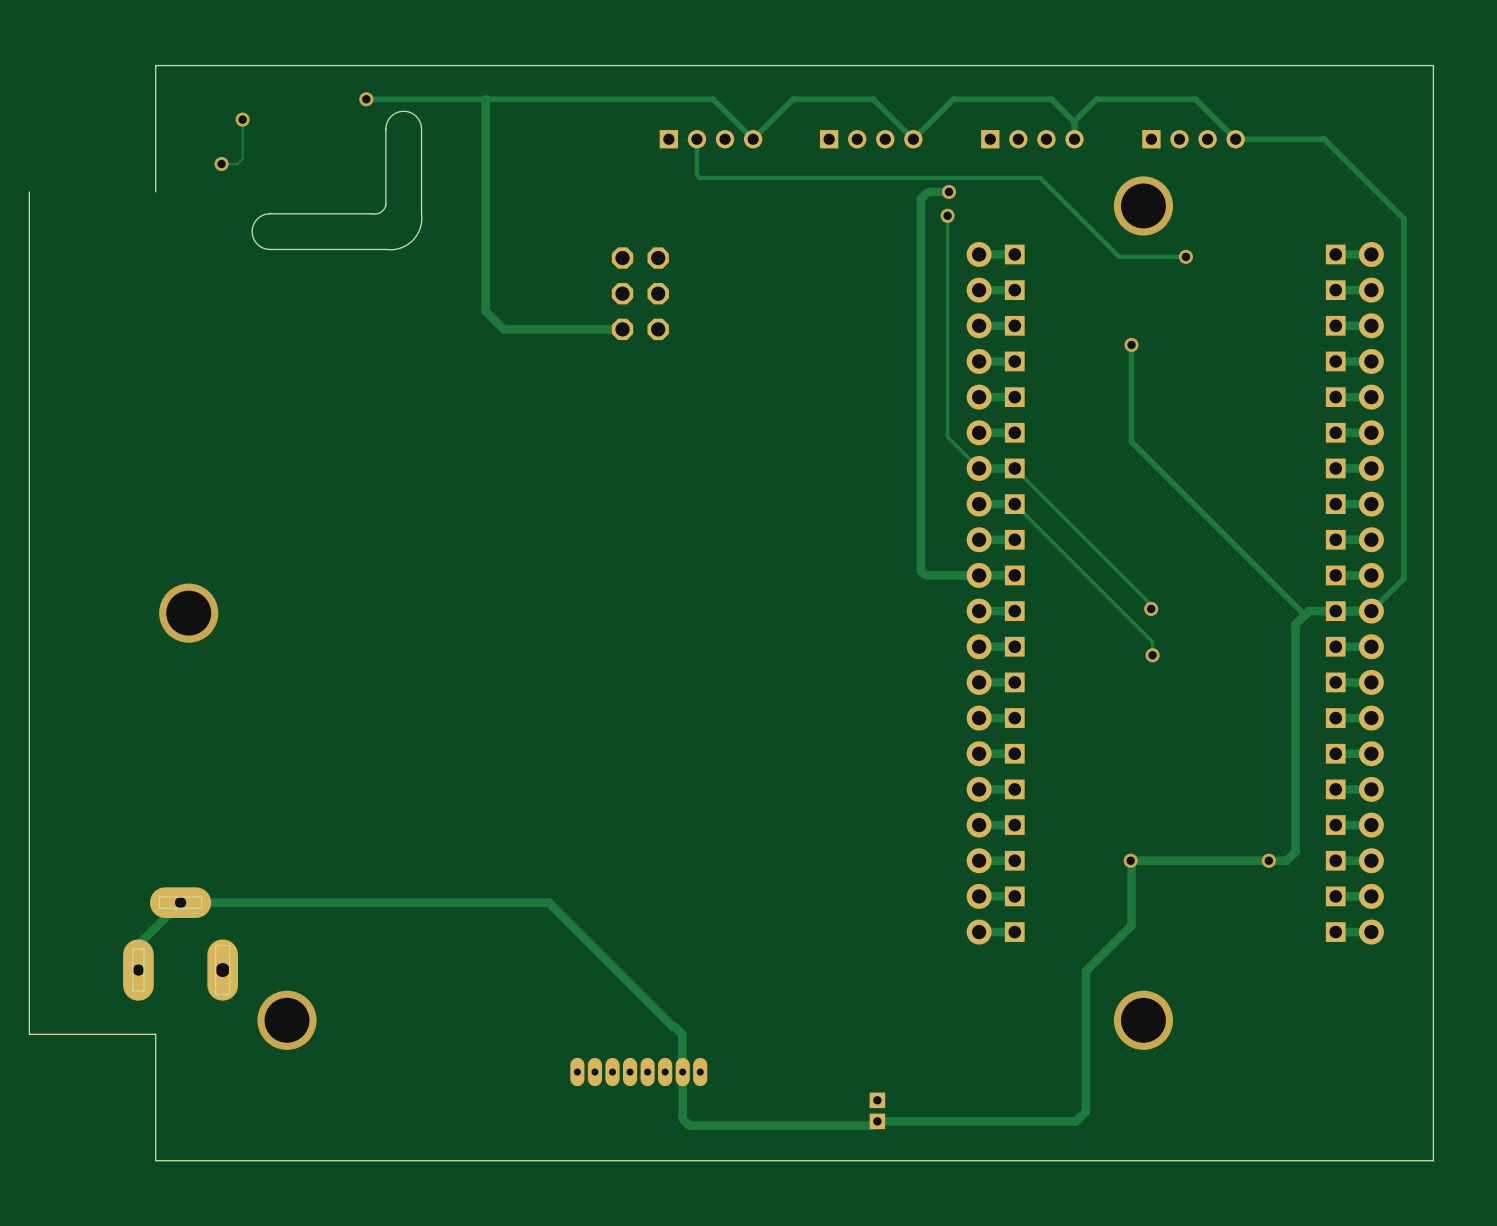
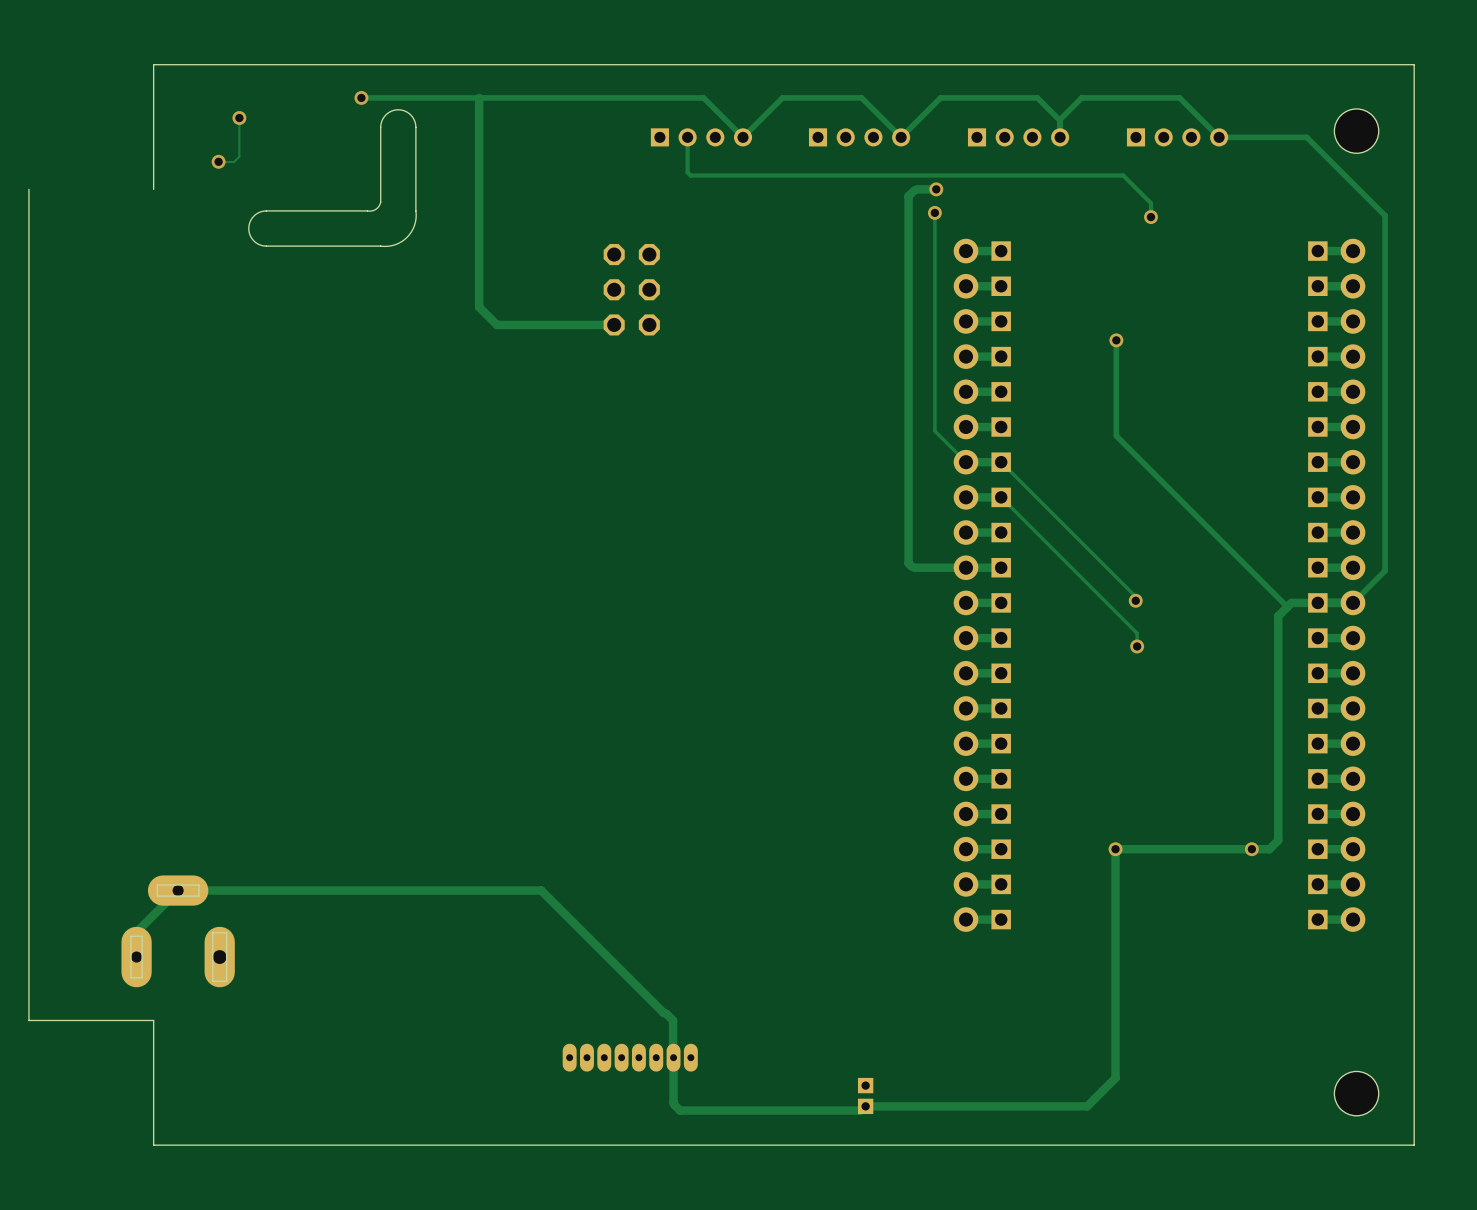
hole: none -> (1356, 131)
track: (1040, 177) (1119, 256) (1185, 256) -> (1026, 175) (1123, 175) (1150, 203) (1150, 217)
via: (1143, 205) -> none
via position: (1185, 256) -> (1150, 217)
via: (188, 613) -> none
track: (1130, 860) (1131, 925) (1085, 971) (1085, 1111) (1076, 1121) -> (1115, 849) (1115, 1078) (1087, 1106) (1061, 1106)
via: (287, 1020) -> none
via: (1143, 1020) -> none
hole: none -> (1356, 1093)

